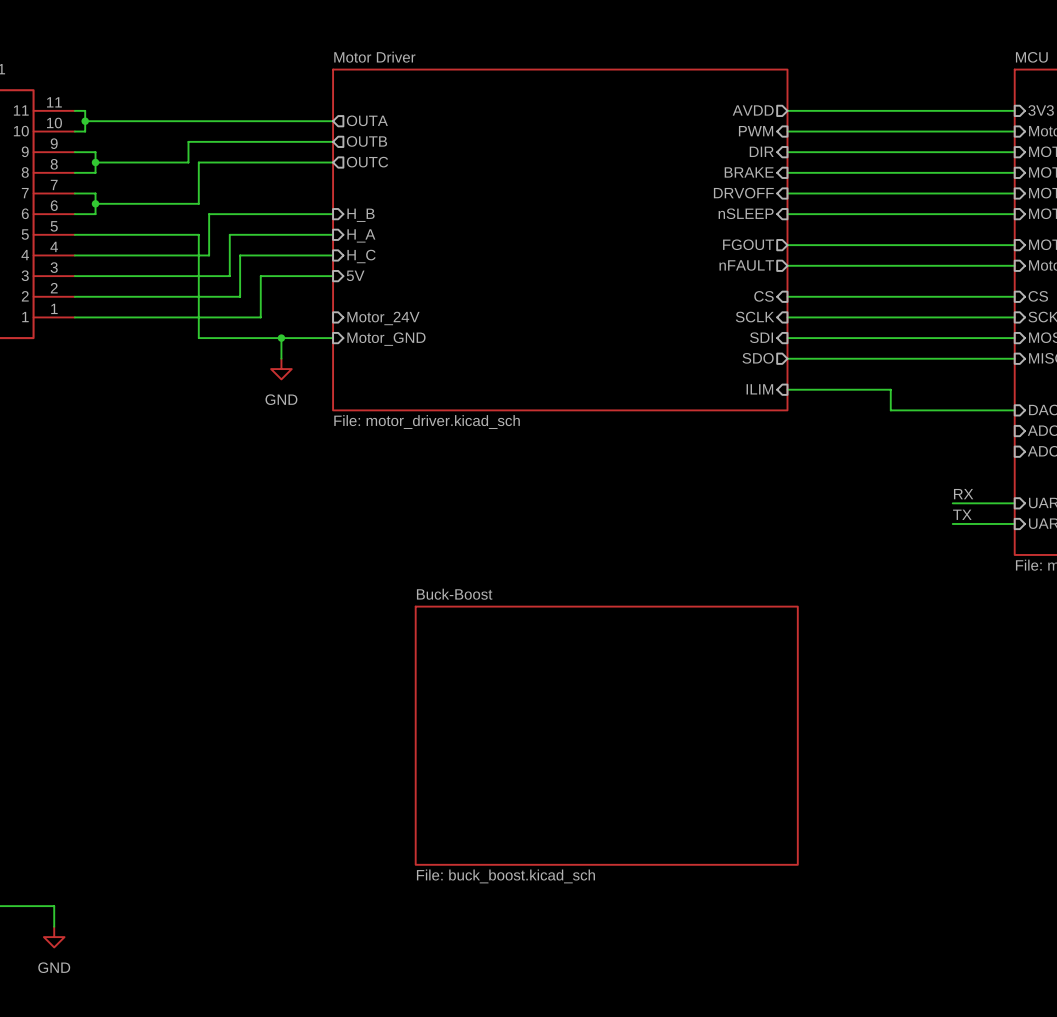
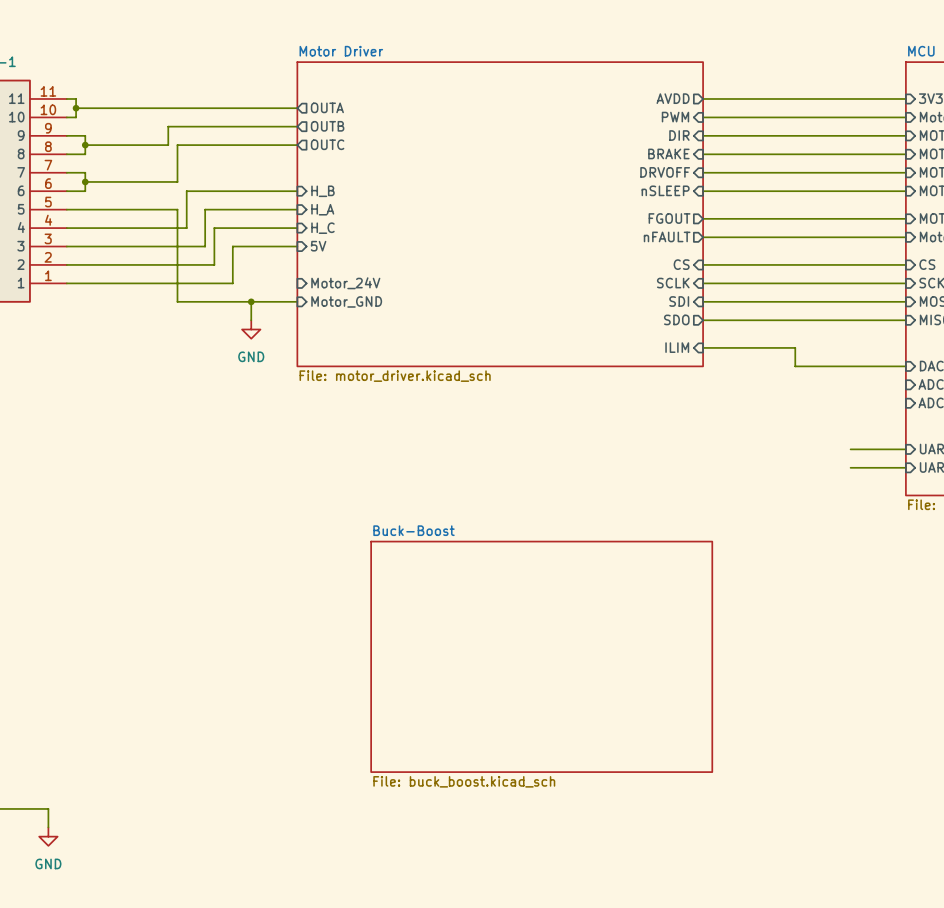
label: RX (963, 494) -> none
label: TX (962, 514) -> none

